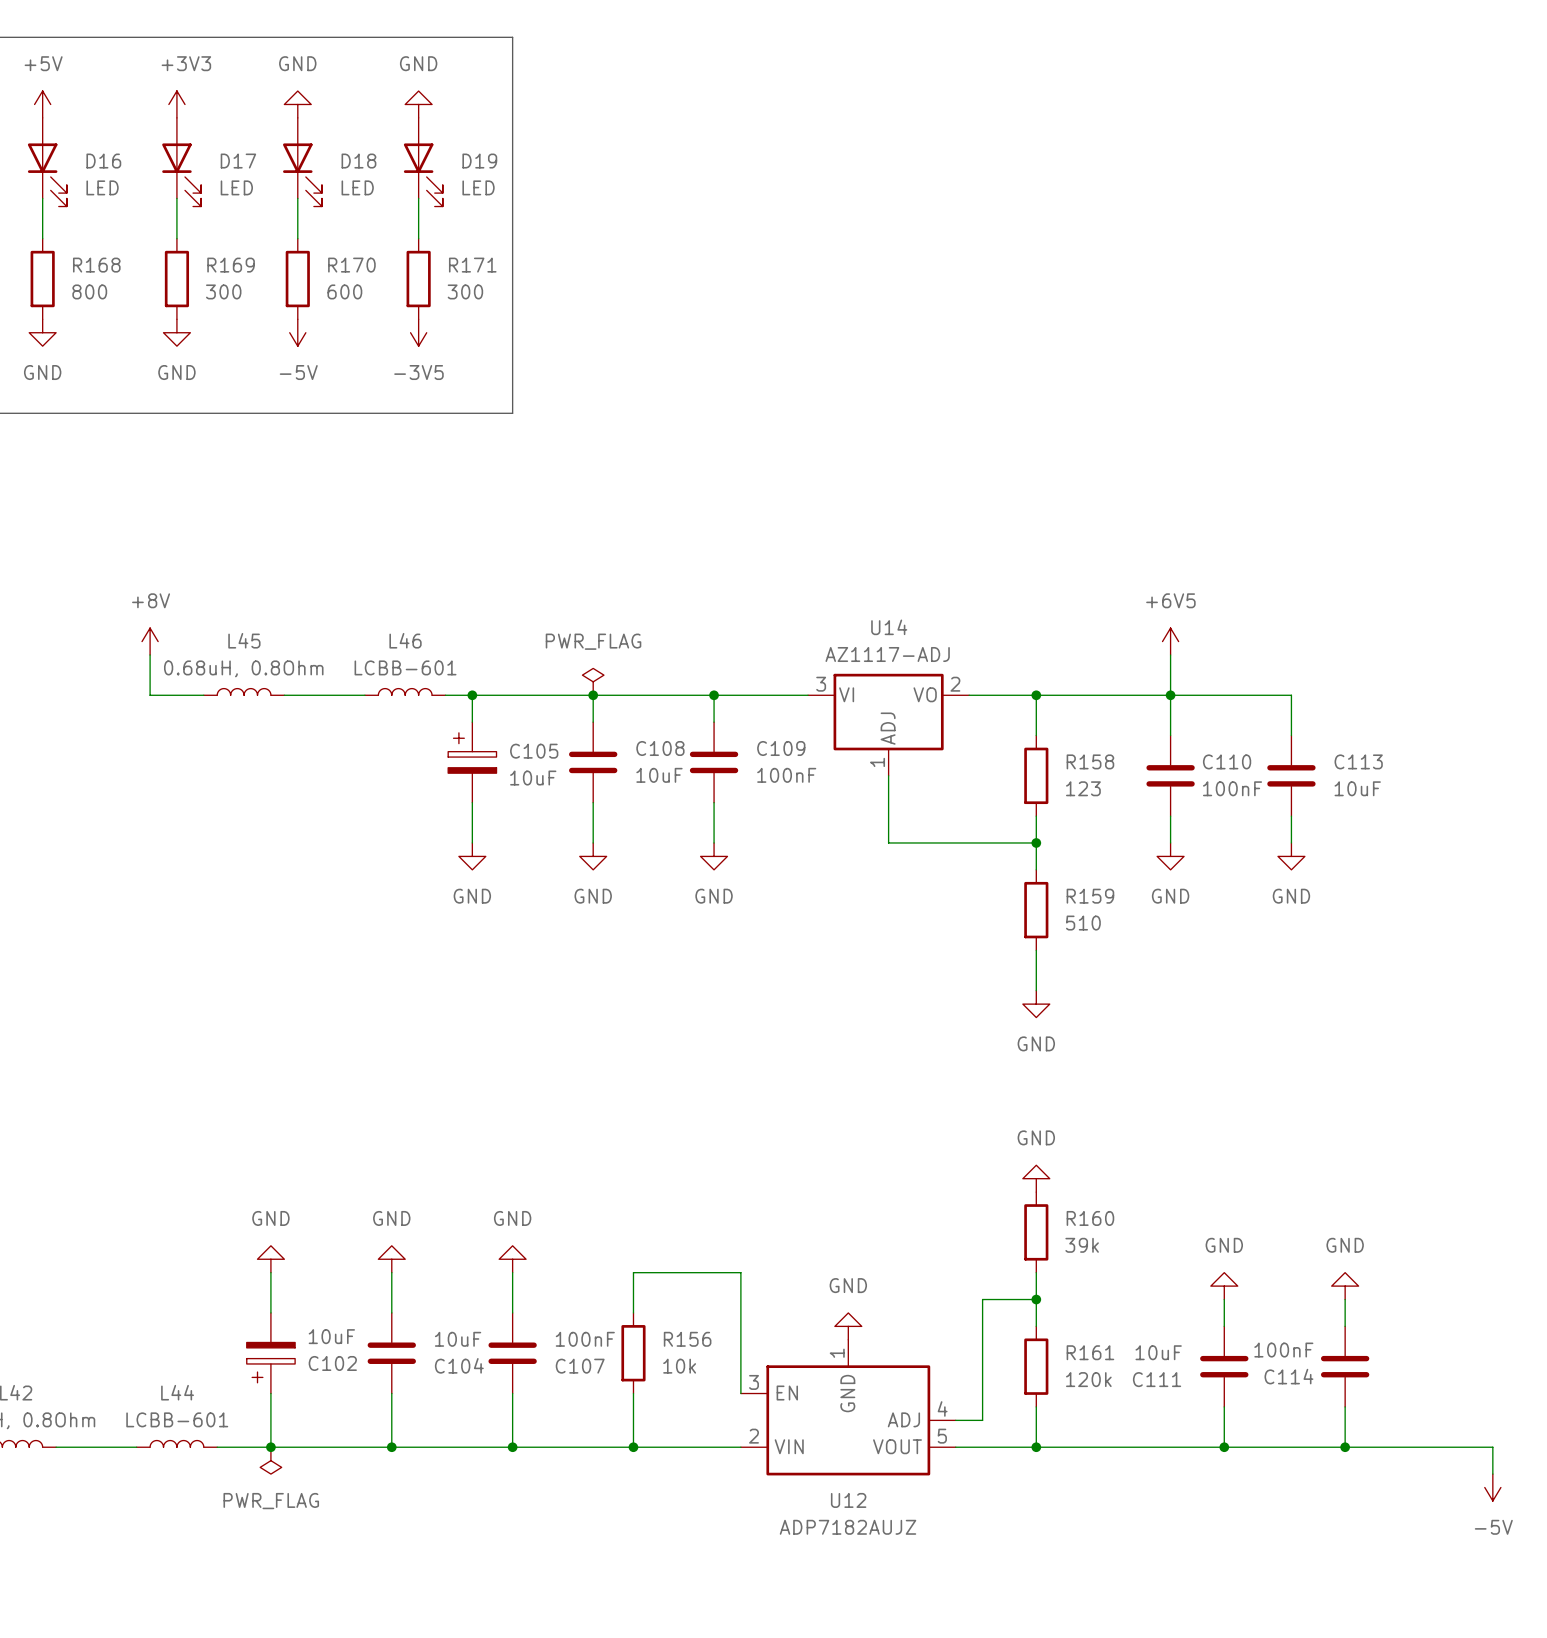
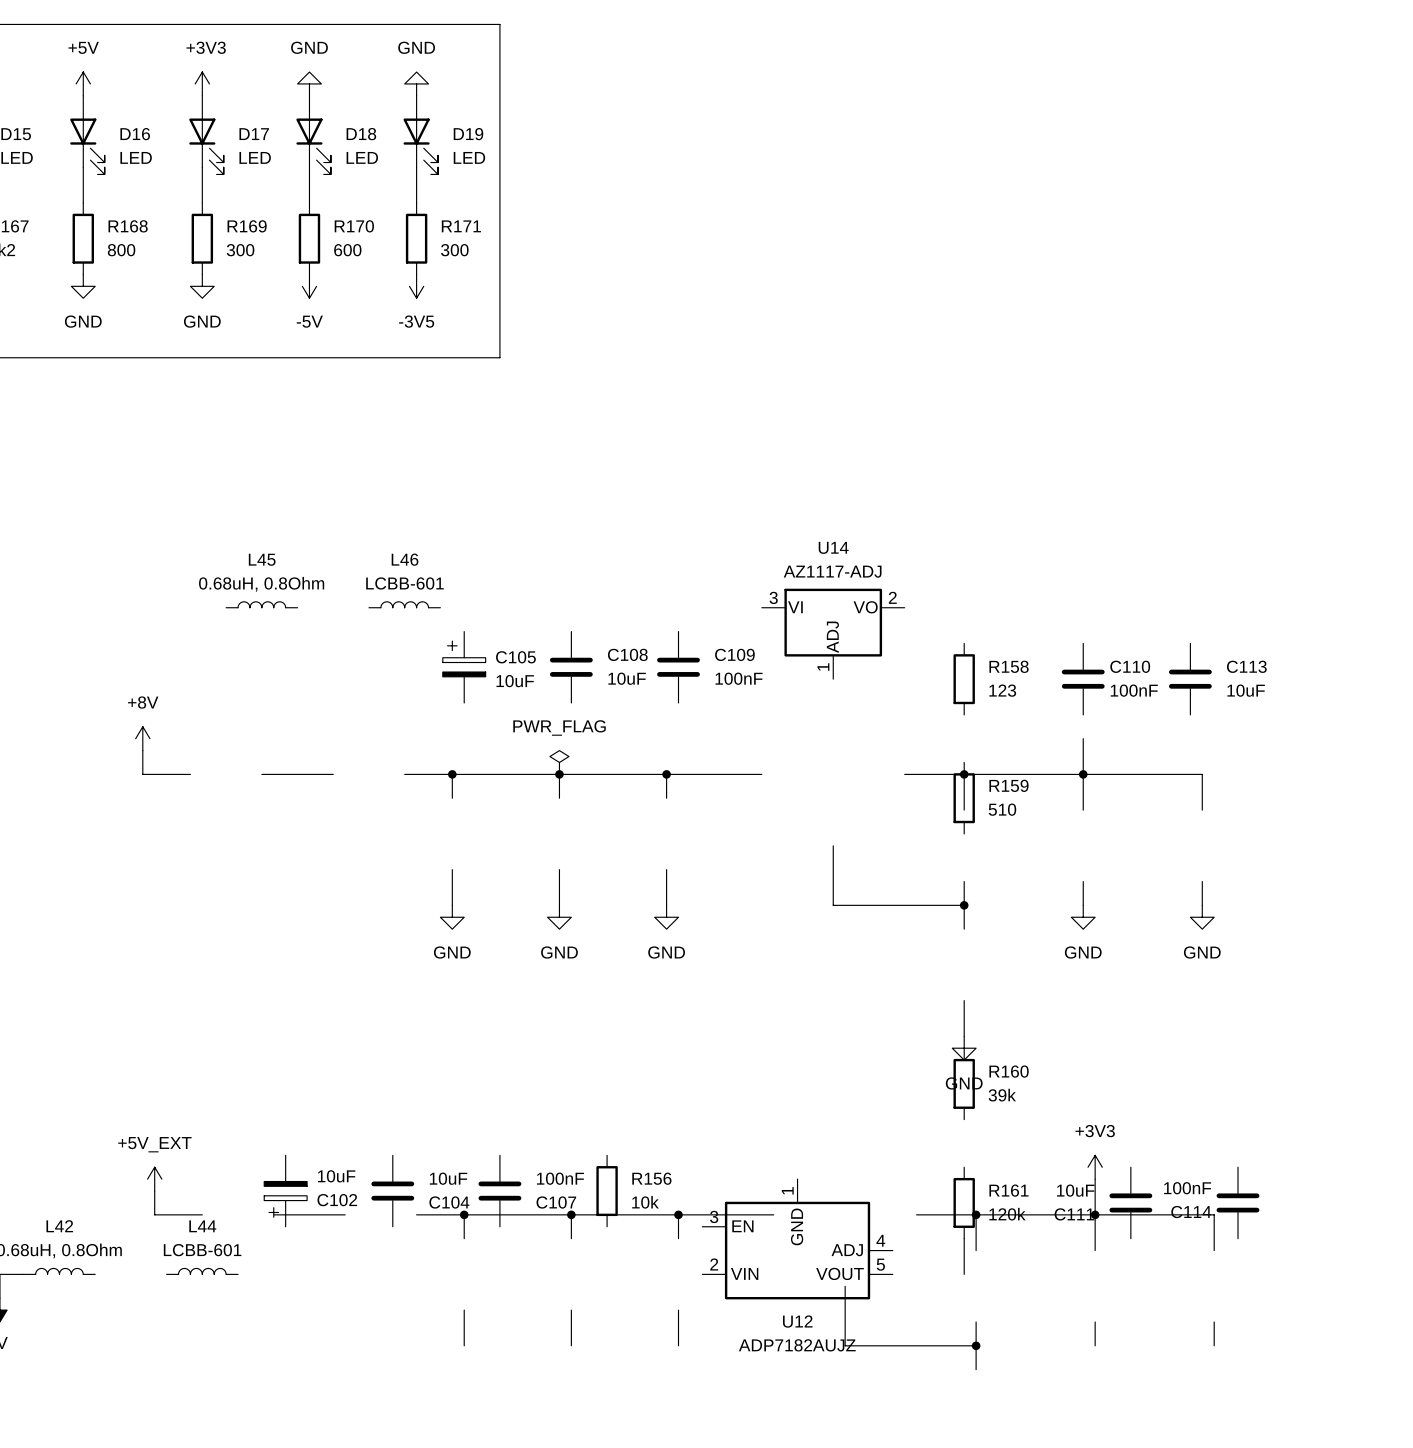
power symbol position: +8V (150, 641) -> +8V (142, 738)
power symbol: +6V5 (1170, 641) -> none
wire: (150, 655) (150, 695) (203, 695) -> none
wire: (1170, 655) (1170, 735) -> none
power symbol position: PWR_FLAG (593, 681) -> PWR_FLAG (559, 762)
wire: (284, 695) (364, 695) -> (261, 774) (333, 774)
wire: (445, 695) (808, 695) -> none
wire: (472, 695) (472, 722) -> (452, 774) (452, 798)
junction: (472, 695) -> none
wire: (593, 695) (593, 722) -> (559, 774) (559, 798)
junction: (593, 695) -> none
wire: (714, 695) (714, 722) -> (666, 774) (666, 798)
junction: (714, 695) -> none
wire: (969, 695) (1291, 695) (1291, 735) -> none
wire: (1036, 695) (1036, 735) -> (964, 774) (964, 810)
junction: (1036, 695) -> none
junction: (1170, 695) -> none
wire: (888, 775) (888, 842) (1036, 842) -> (833, 845) (833, 905) (964, 905)
wire: (472, 802) (472, 842) -> (452, 869) (452, 905)
wire: (593, 802) (593, 842) -> (559, 869) (559, 905)
wire: (714, 802) (714, 842) -> (666, 869) (666, 905)
wire: (1036, 816) (1036, 869) -> (964, 881) (964, 929)
wire: (1170, 816) (1170, 842) -> (1083, 810) (1083, 738)
wire: (1291, 816) (1291, 842) -> (1202, 881) (1202, 905)
junction position: (1036, 842) -> (964, 774)
wire: none -> (142, 750) (142, 774) (190, 774)
power symbol: GND (472, 856) -> none
power symbol: GND (593, 856) -> none
power symbol: GND (714, 856) -> none
power symbol: GND (1170, 856) -> none
power symbol: GND (1291, 856) -> none
wire: none -> (404, 774) (761, 774)
junction: none -> (452, 774)
junction: none -> (559, 774)
junction: none -> (666, 774)
wire: none -> (904, 774) (1202, 774) (1202, 810)
junction: none -> (1083, 774)
wire: (1036, 950) (1036, 990) -> (964, 1000) (964, 1036)
power symbol: GND (1036, 1004) -> none
wire: none -> (1083, 881) (1083, 905)
junction: none -> (964, 905)
power symbol: none -> GND (452, 917)
power symbol: none -> GND (559, 917)
power symbol: none -> GND (666, 917)
power symbol: none -> GND (1083, 917)
power symbol: none -> GND (1202, 917)
power symbol rotation: 0° (1036, 1178) -> 180° (964, 1048)
power symbol: GND (270, 1259) -> none
power symbol: GND (391, 1259) -> none
power symbol: GND (512, 1259) -> none
wire: (270, 1272) (270, 1312) -> none
wire: (391, 1272) (391, 1312) -> (464, 1310) (464, 1345)
wire: (512, 1272) (512, 1312) -> (571, 1310) (571, 1345)
wire: (1036, 1272) (1036, 1326) -> (976, 1322) (976, 1369)
power symbol: GND (1224, 1286) -> none
power symbol: GND (1345, 1286) -> none
wire: (1036, 1299) (982, 1299) (982, 1420) (955, 1420) -> none
junction: (1036, 1299) -> none
wire: (1224, 1299) (1224, 1326) -> (1095, 1322) (1095, 1345)
wire: (1345, 1299) (1345, 1326) -> (1214, 1322) (1214, 1345)
wire: (633, 1312) (633, 1272) (740, 1272) (740, 1393) -> none
power symbol: GND (848, 1326) -> none
power symbol: none -> +3V3 (1095, 1167)
power symbol: none -> +5V_EXT (154, 1179)
wire: none -> (1095, 1179) (1095, 1250)
wire: none -> (154, 1191) (154, 1214) (202, 1214)
wire: none -> (416, 1214) (773, 1214)
wire: none -> (464, 1214) (464, 1238)
junction: none -> (464, 1214)
wire: none -> (571, 1214) (571, 1238)
junction: none -> (571, 1214)
wire: none -> (678, 1214) (678, 1238)
junction: none -> (678, 1214)
wire: none -> (916, 1214) (1214, 1214) (1214, 1250)
junction: none -> (976, 1214)
junction: none -> (1095, 1214)
wire: (270, 1393) (270, 1447) -> none
wire: (391, 1393) (391, 1447) -> none
wire: (512, 1393) (512, 1447) -> none
wire: (633, 1393) (633, 1447) -> none
wire: (1224, 1406) (1224, 1447) -> (976, 1214) (976, 1250)
wire: (1345, 1406) (1345, 1447) -> none
wire: (56, 1447) (136, 1447) -> (273, 1214) (345, 1214)
wire: (217, 1447) (740, 1447) -> none
junction: (270, 1447) -> none
junction: (391, 1447) -> none
junction: (512, 1447) -> none
junction: (633, 1447) -> none
wire: (955, 1447) (1492, 1447) (1492, 1474) -> none
junction: (1036, 1447) -> none
junction: (1224, 1447) -> none
junction: (1345, 1447) -> none
power symbol: PWR_FLAG (270, 1460) -> none
wire: none -> (845, 1286) (845, 1345) (976, 1345)
wire: none -> (678, 1310) (678, 1345)
power symbol: -5V (1492, 1487) -> none
junction: none -> (976, 1345)

